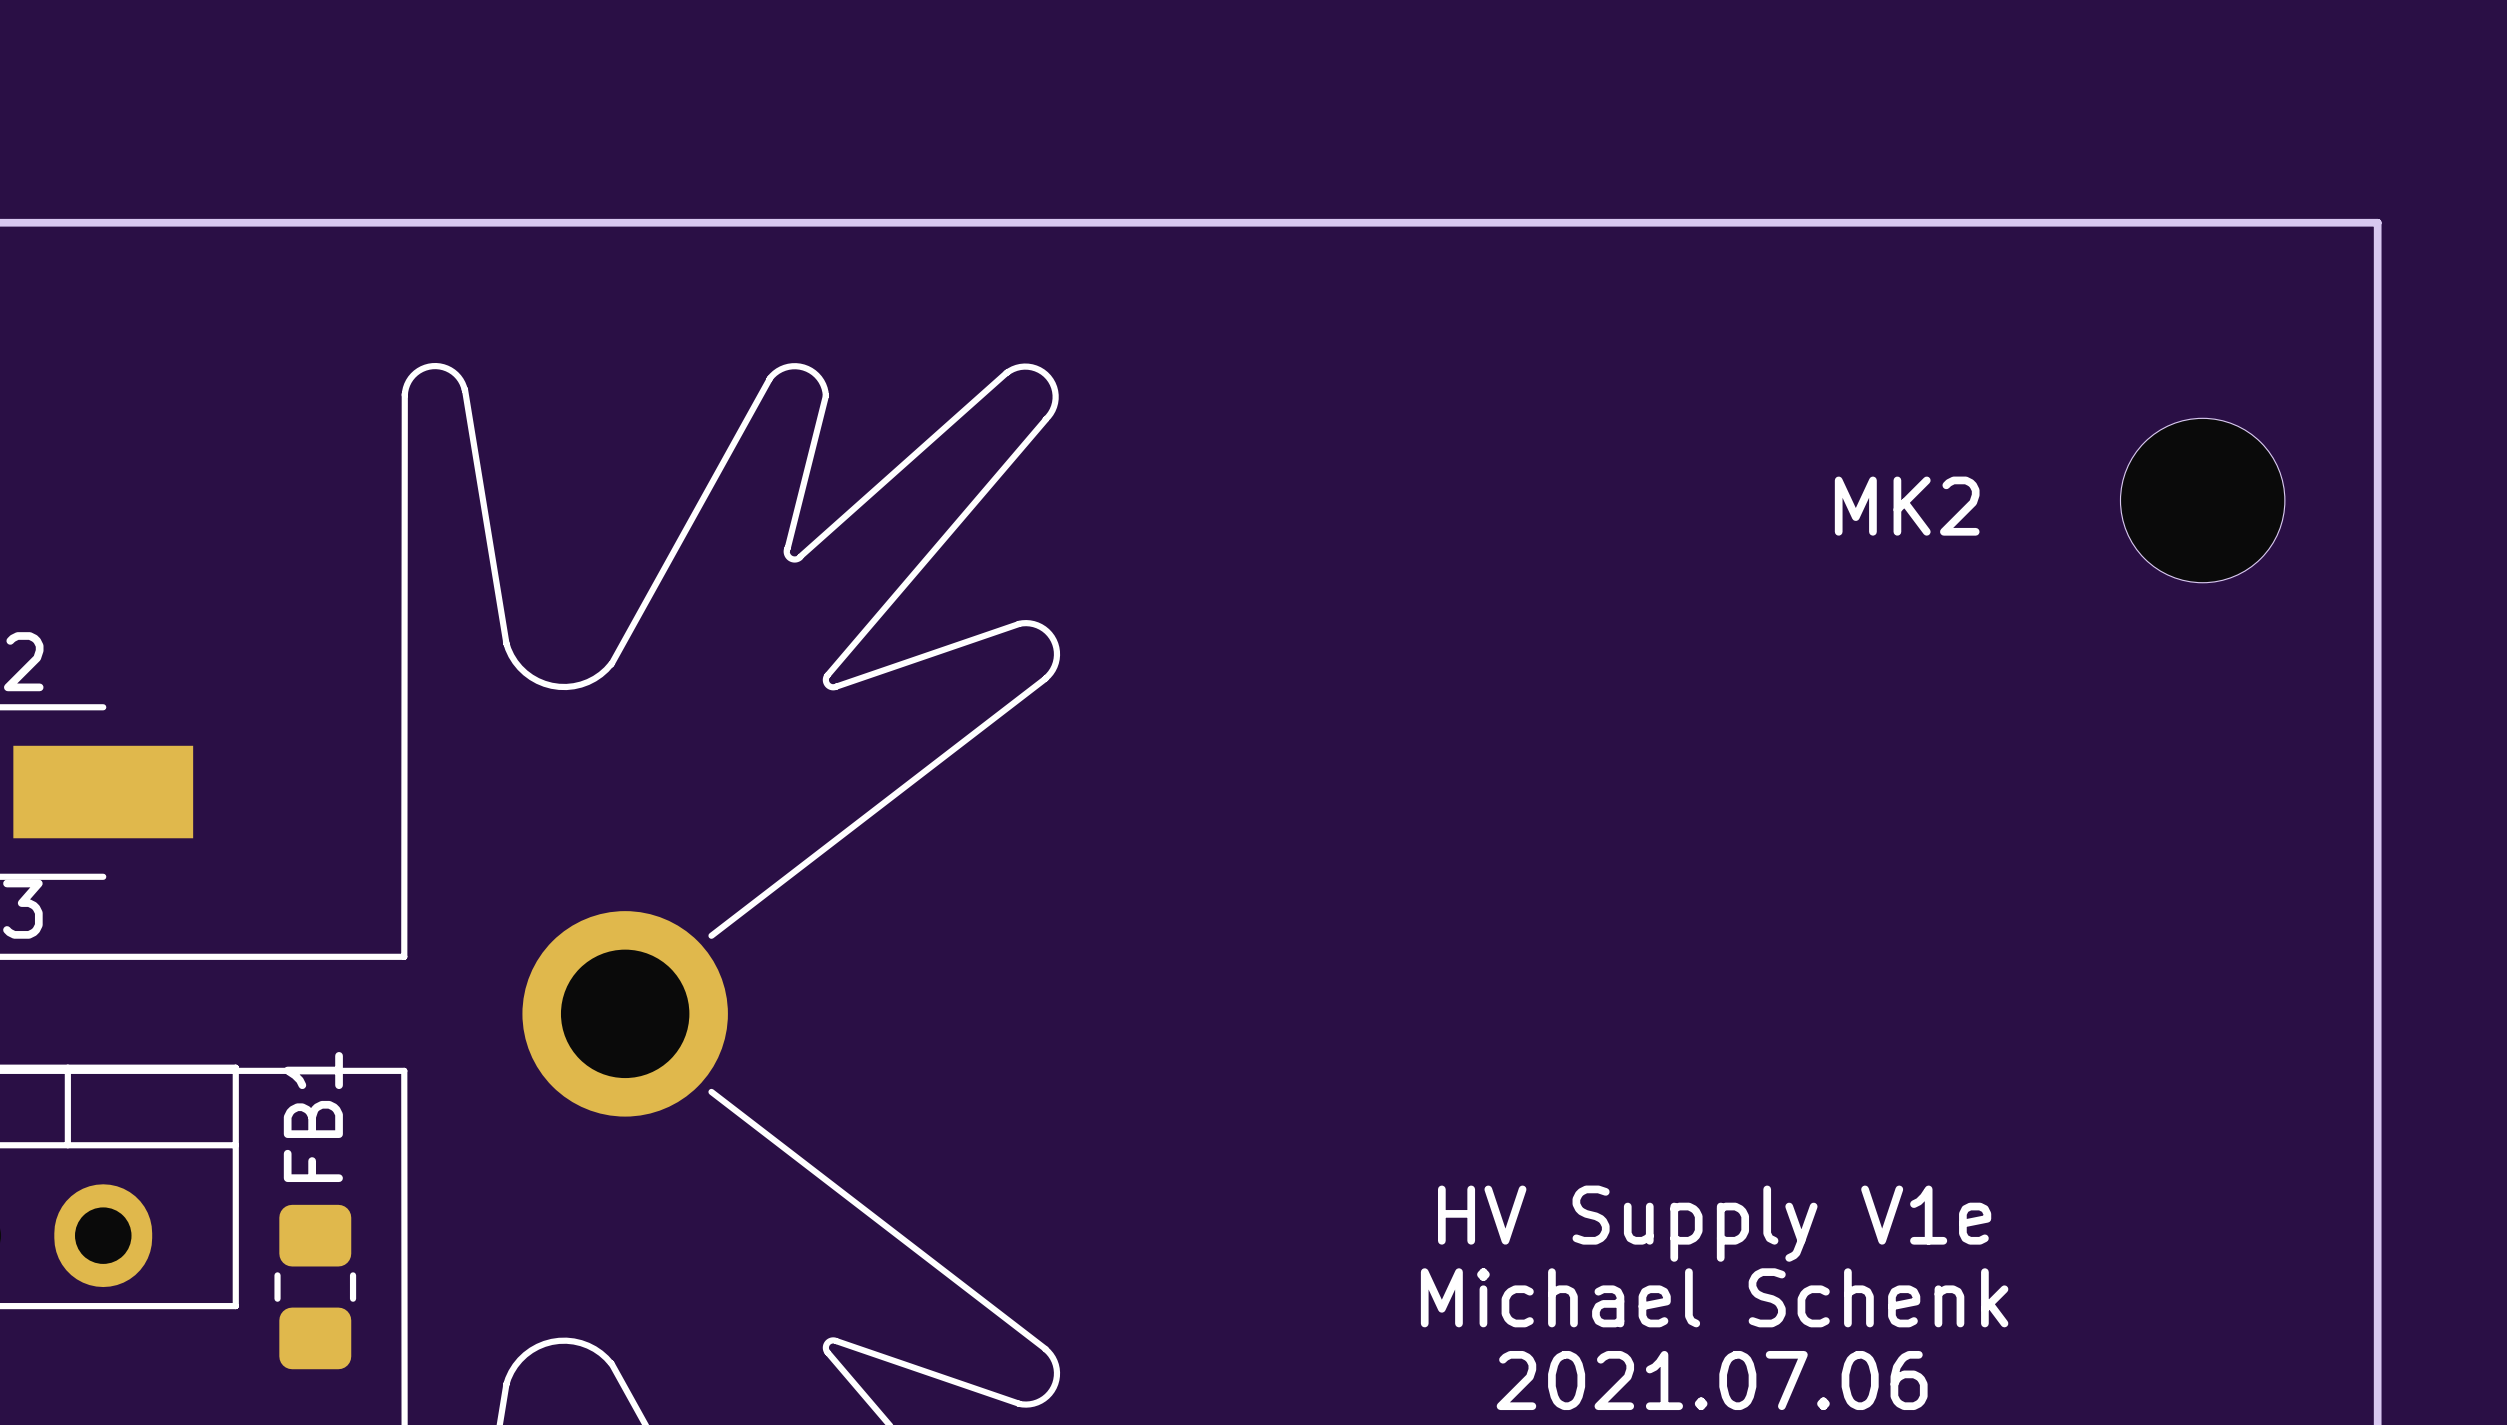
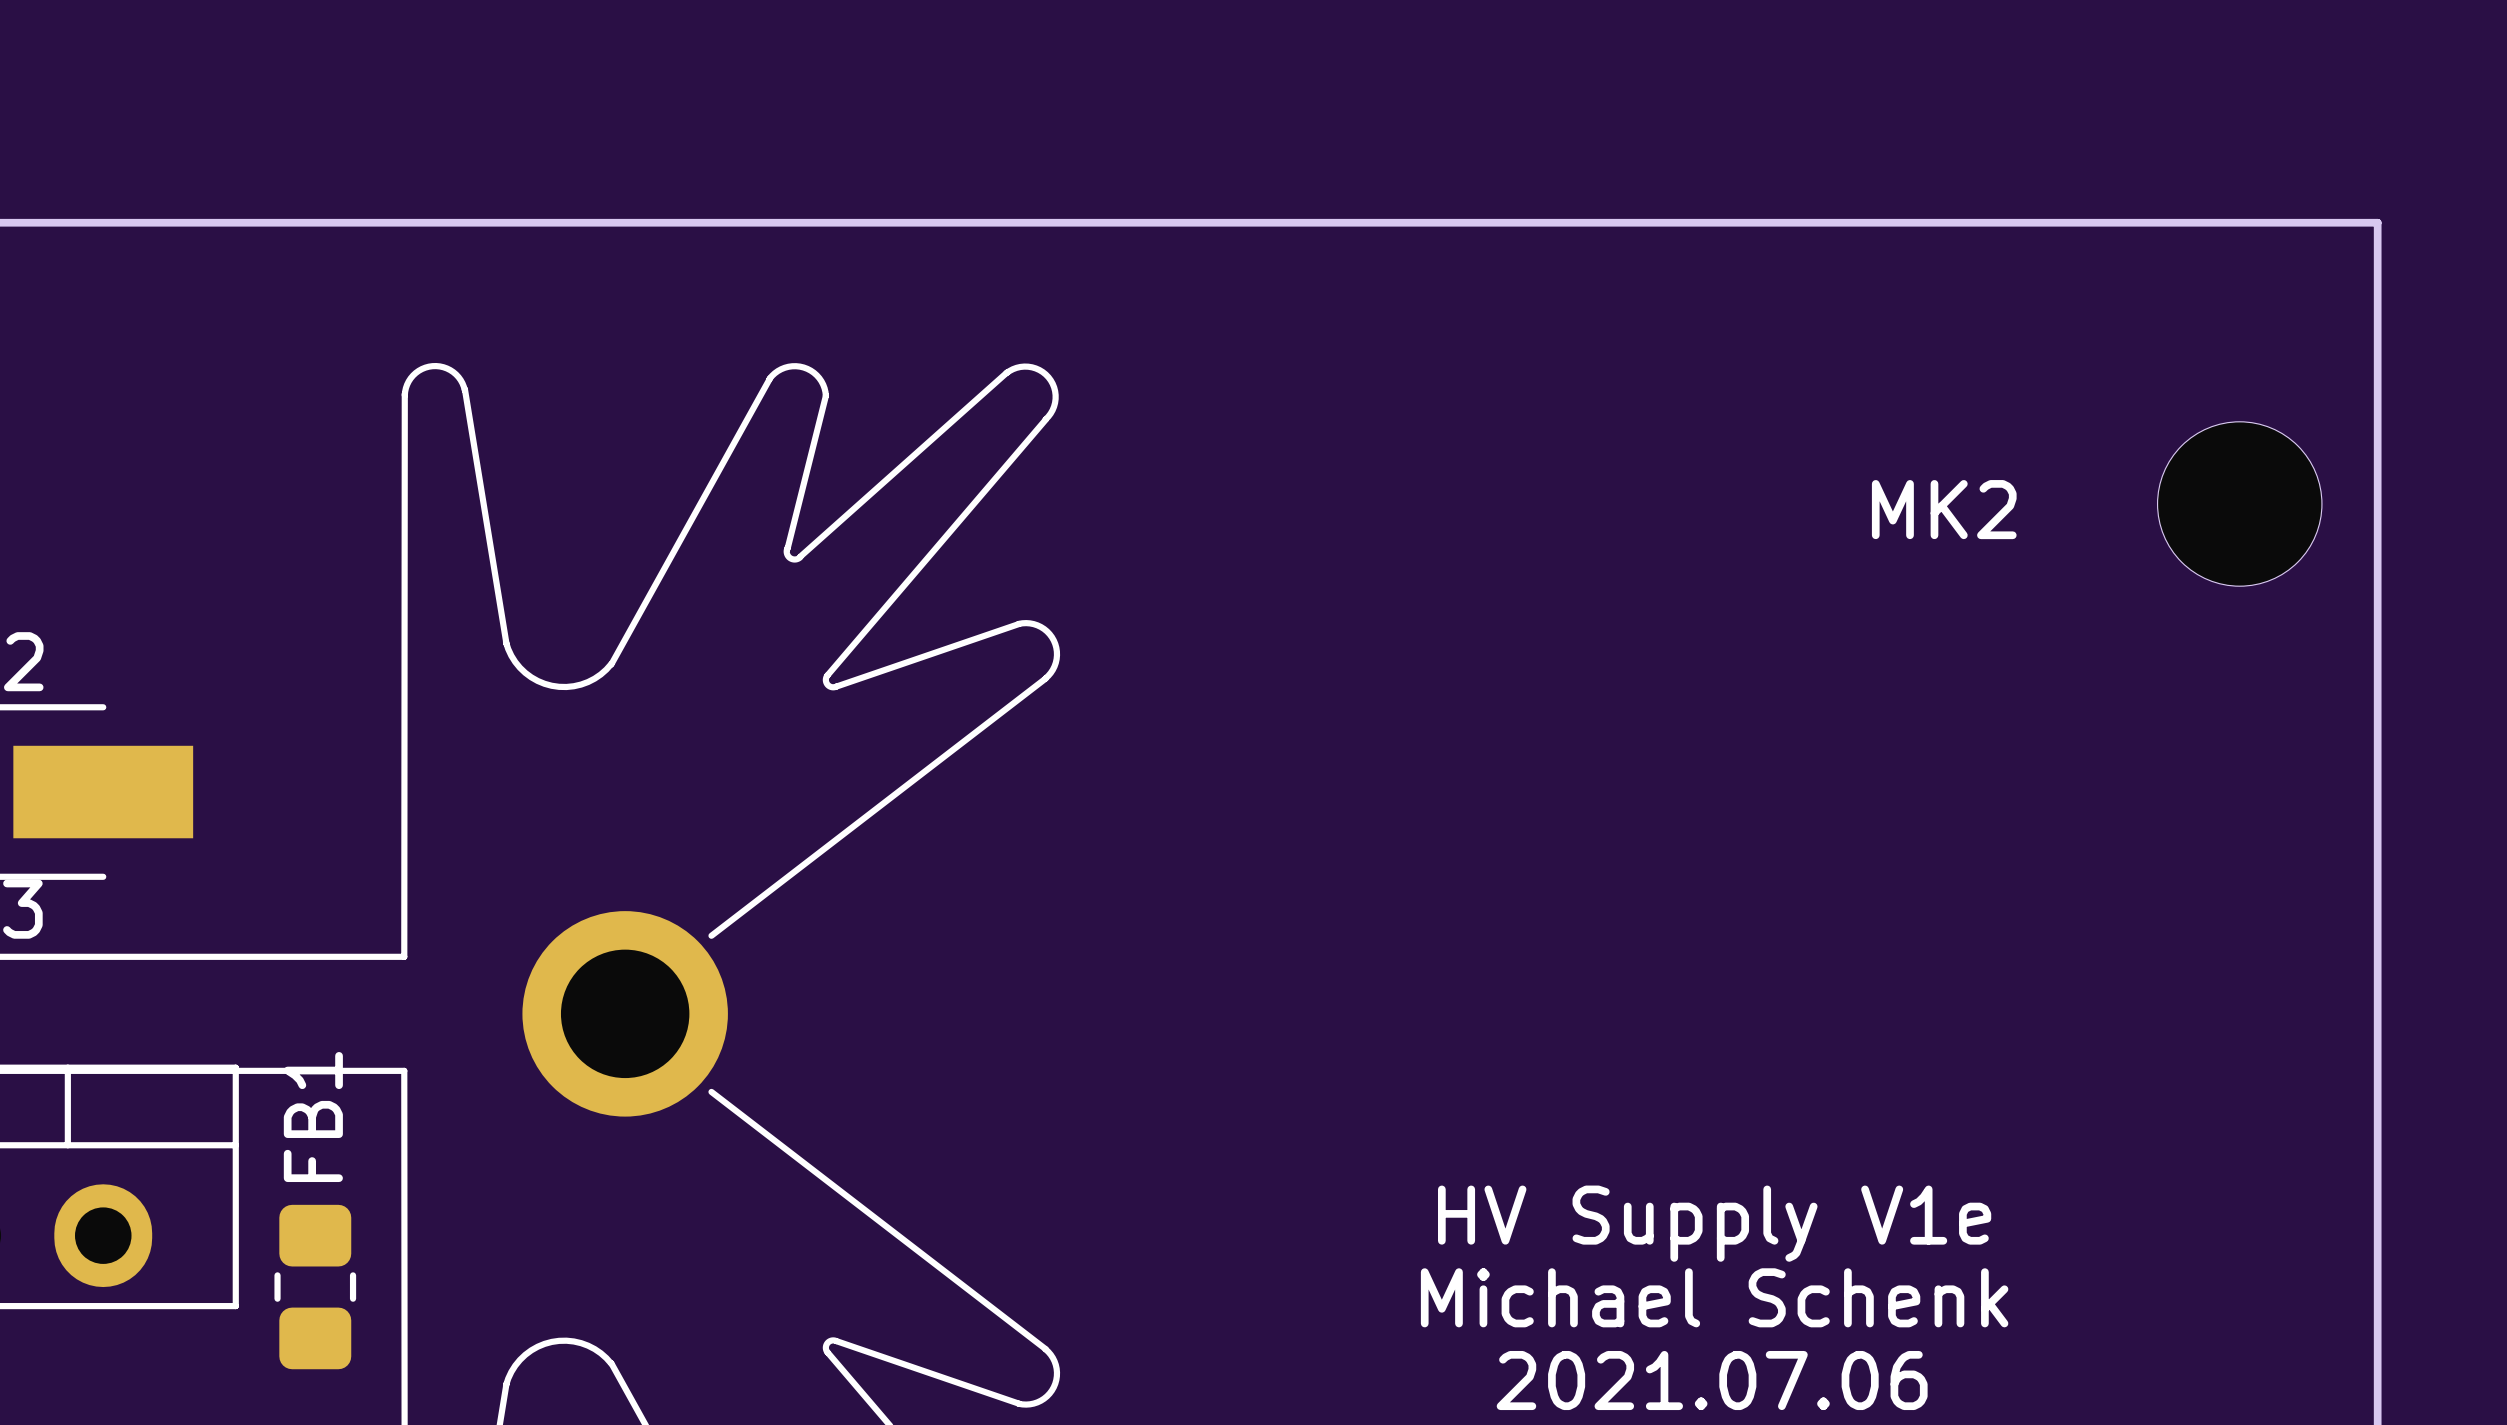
MK2 position: (2202, 500) -> (2239, 504)

